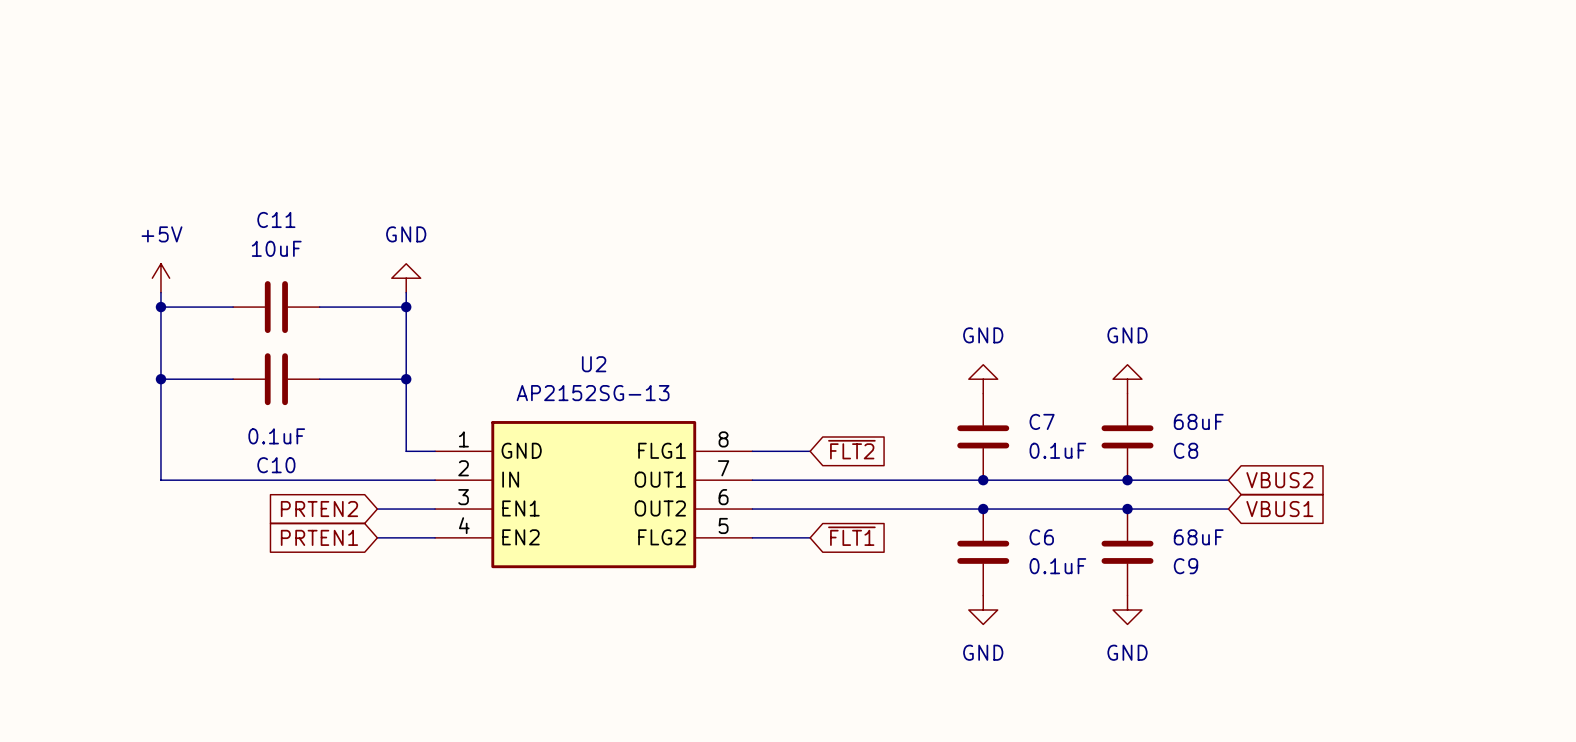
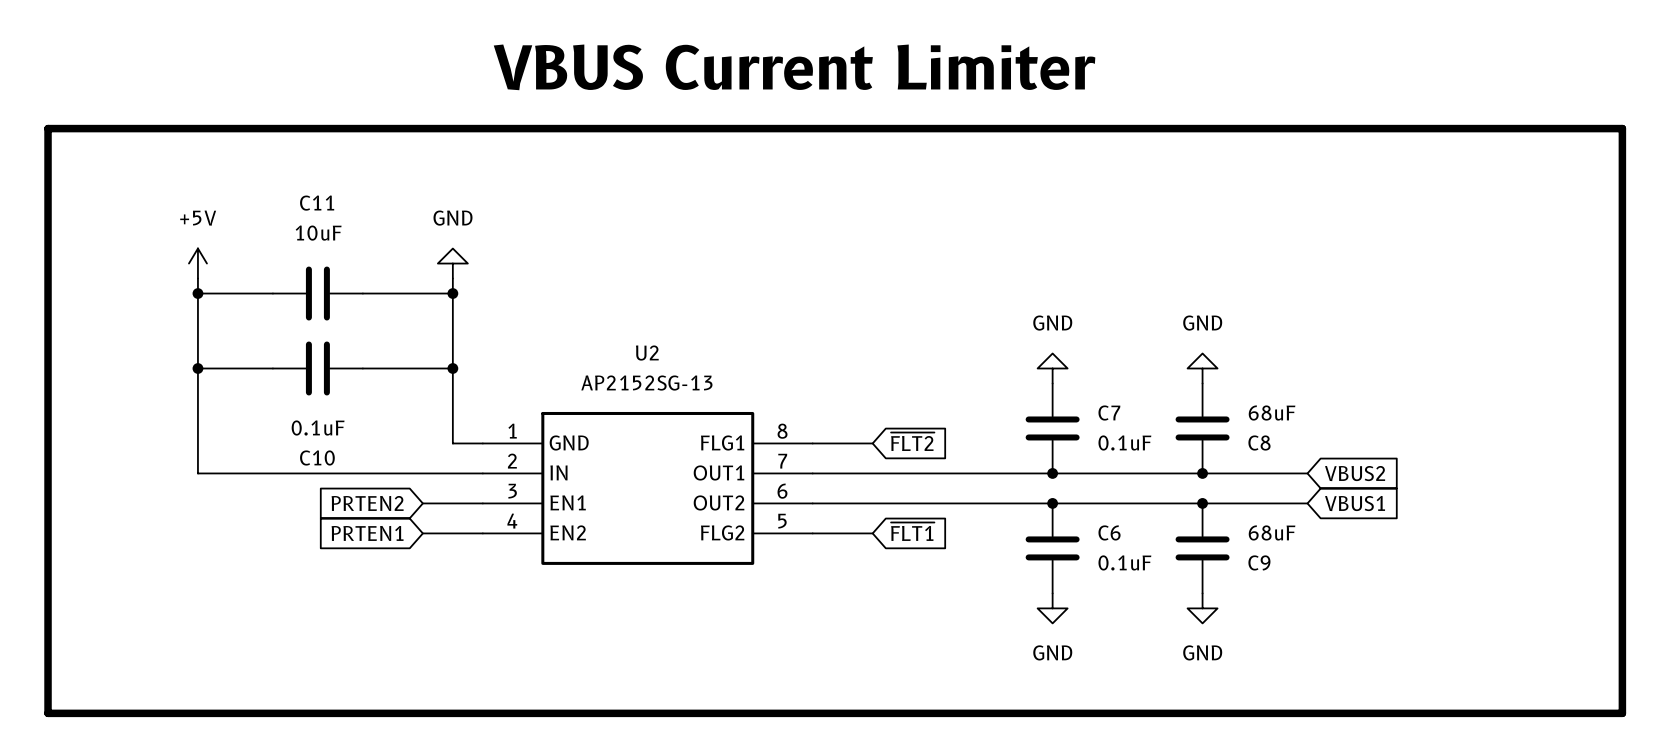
text: none -> VBUS Current Limiter (794, 67)
line: none -> (48, 128) (1622, 128) (1622, 713) (48, 713) (48, 128)

